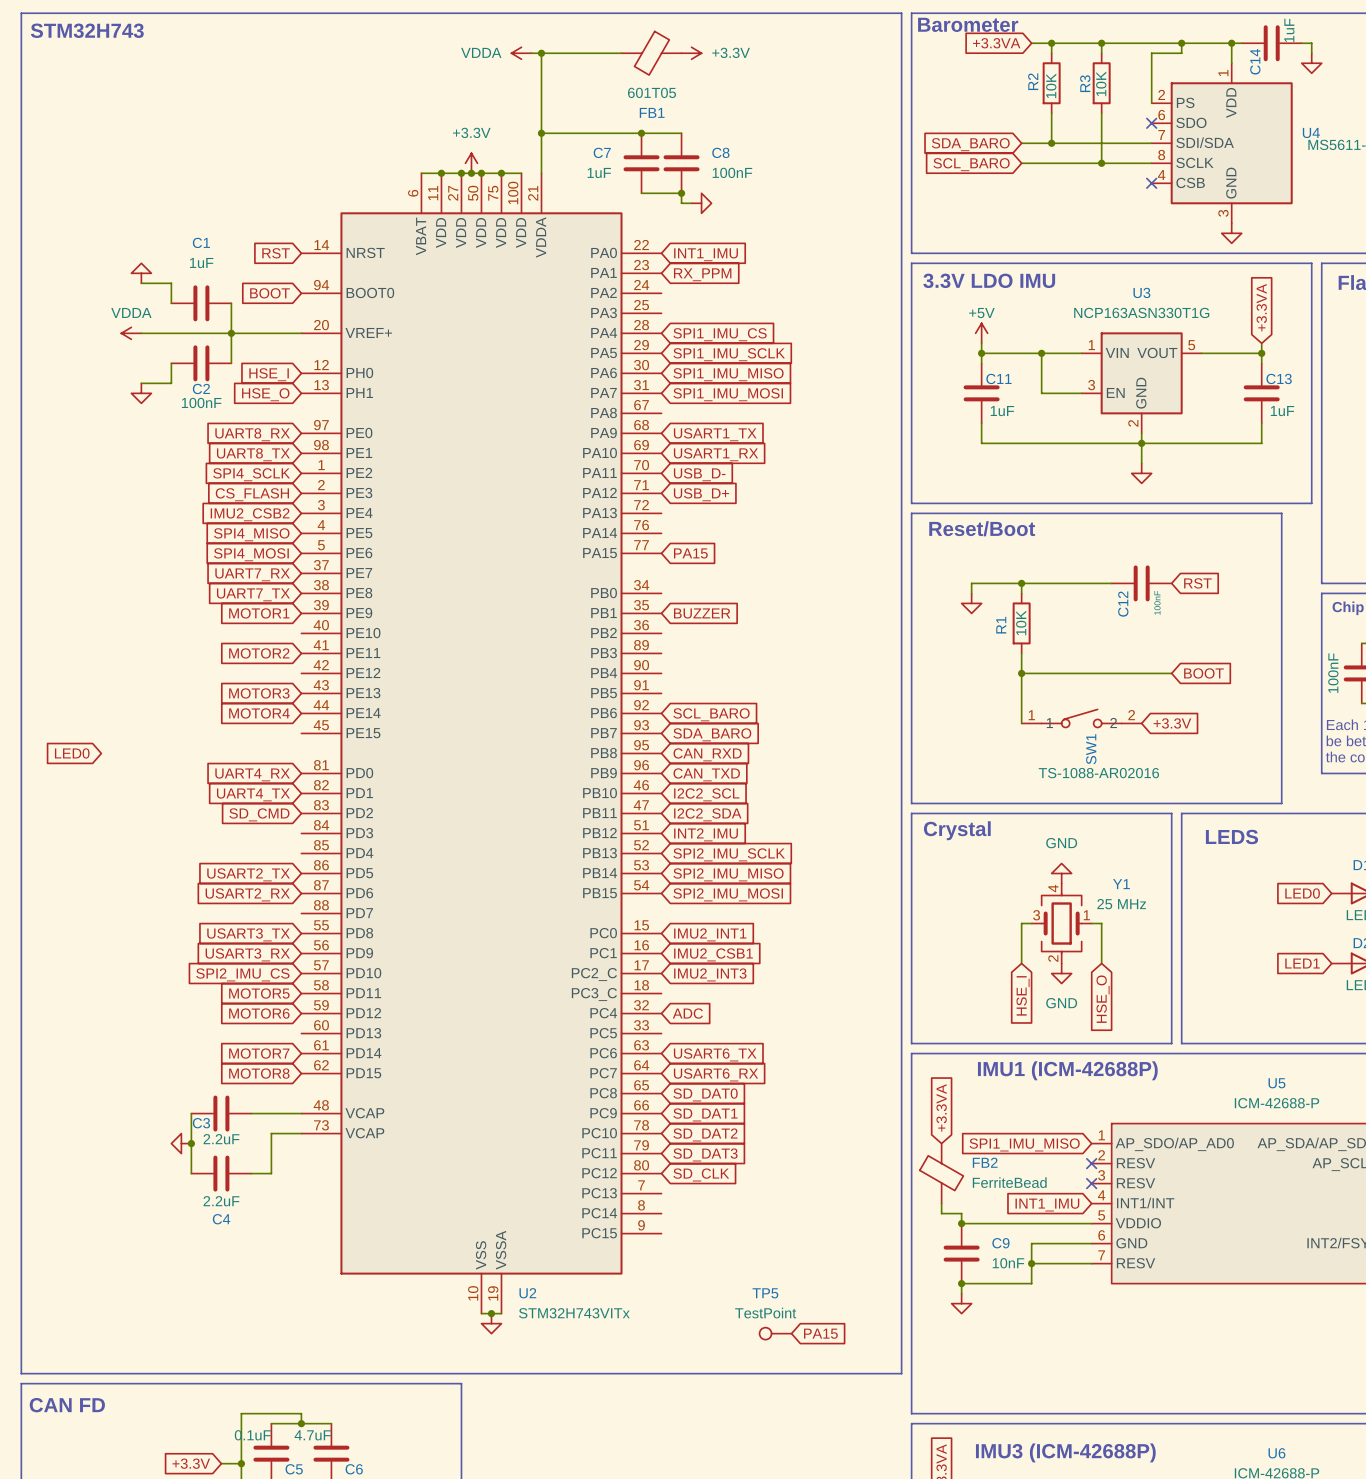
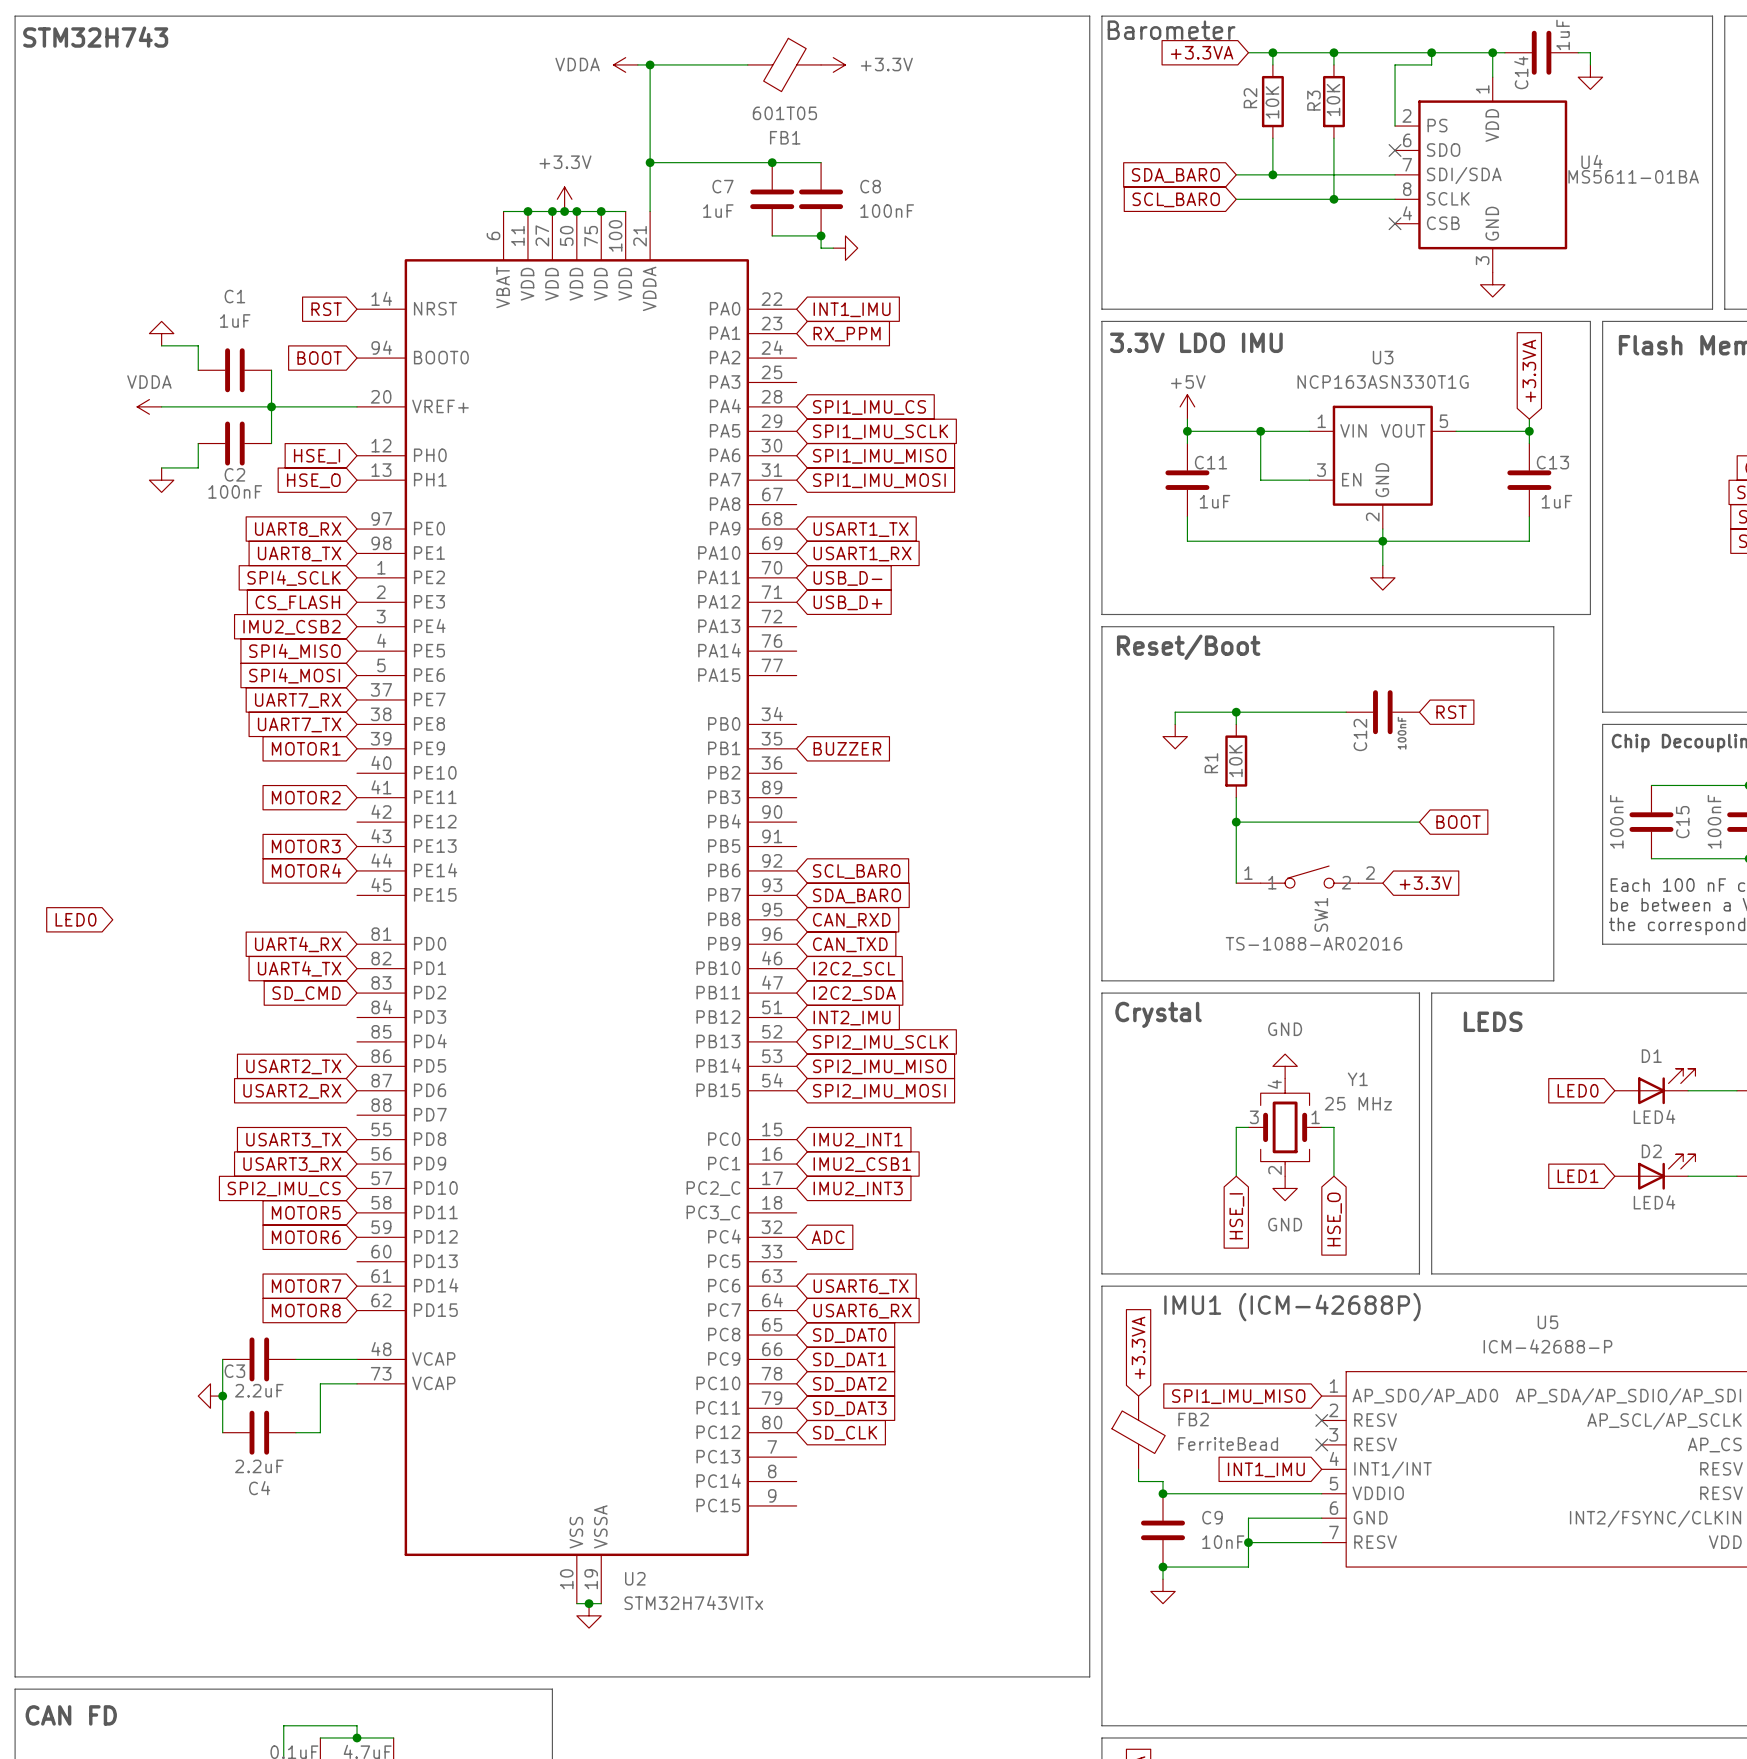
global label: PA15 (690, 553) -> none
TP5: TestPoint (775, 1333) -> none
global label: PA15 (820, 1333) -> none

